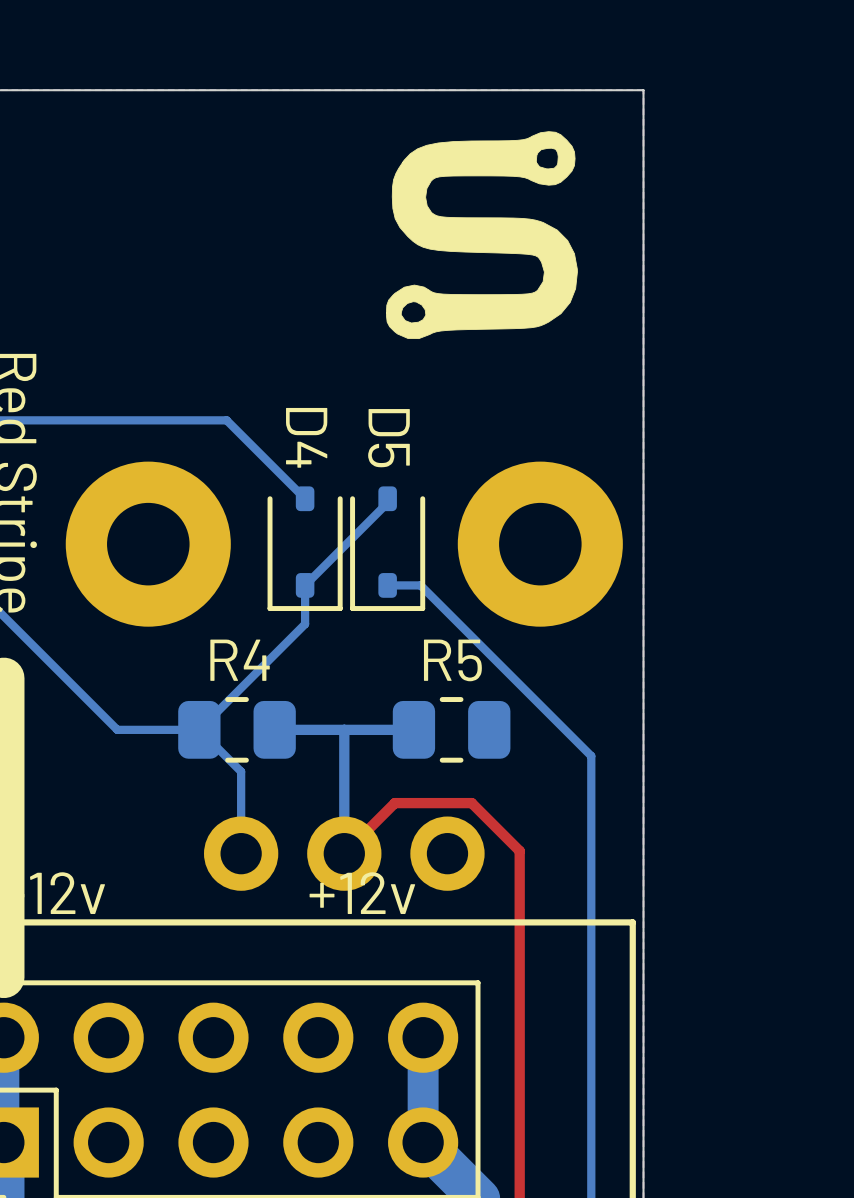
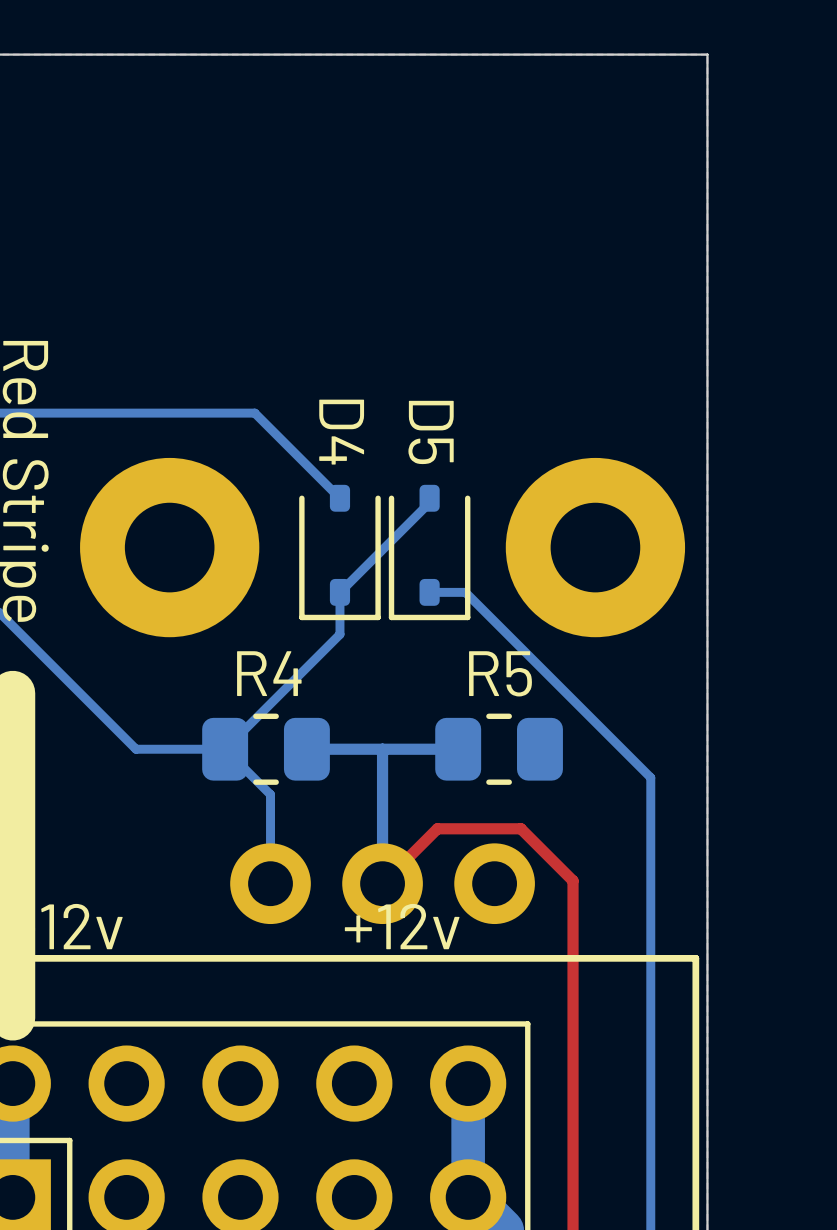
drawing: [385, 131, 578, 340] -> none

